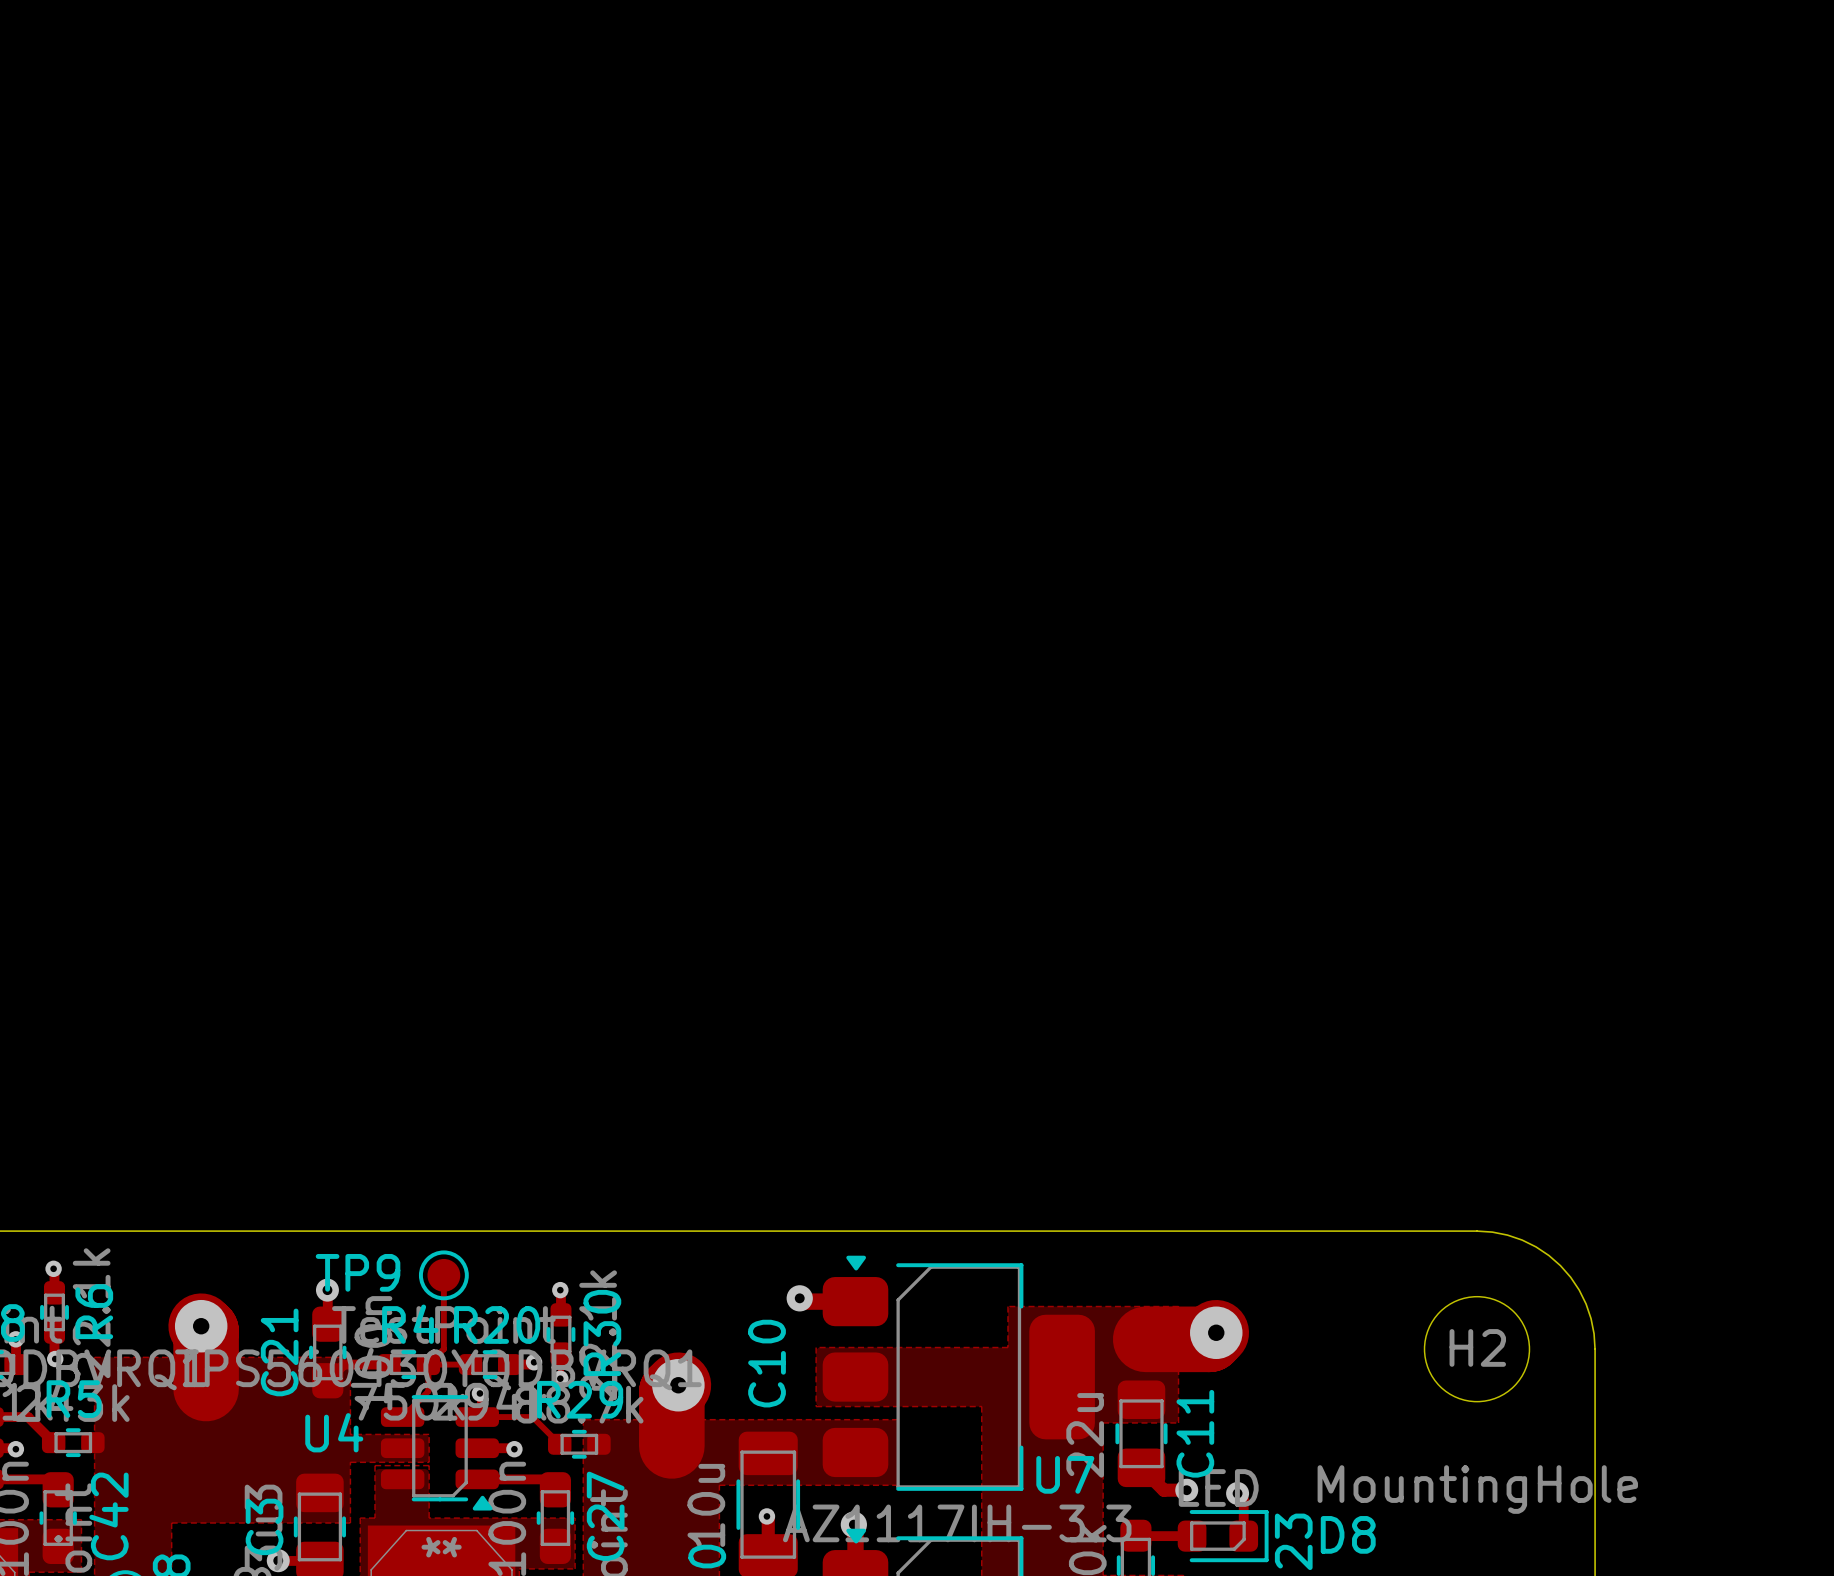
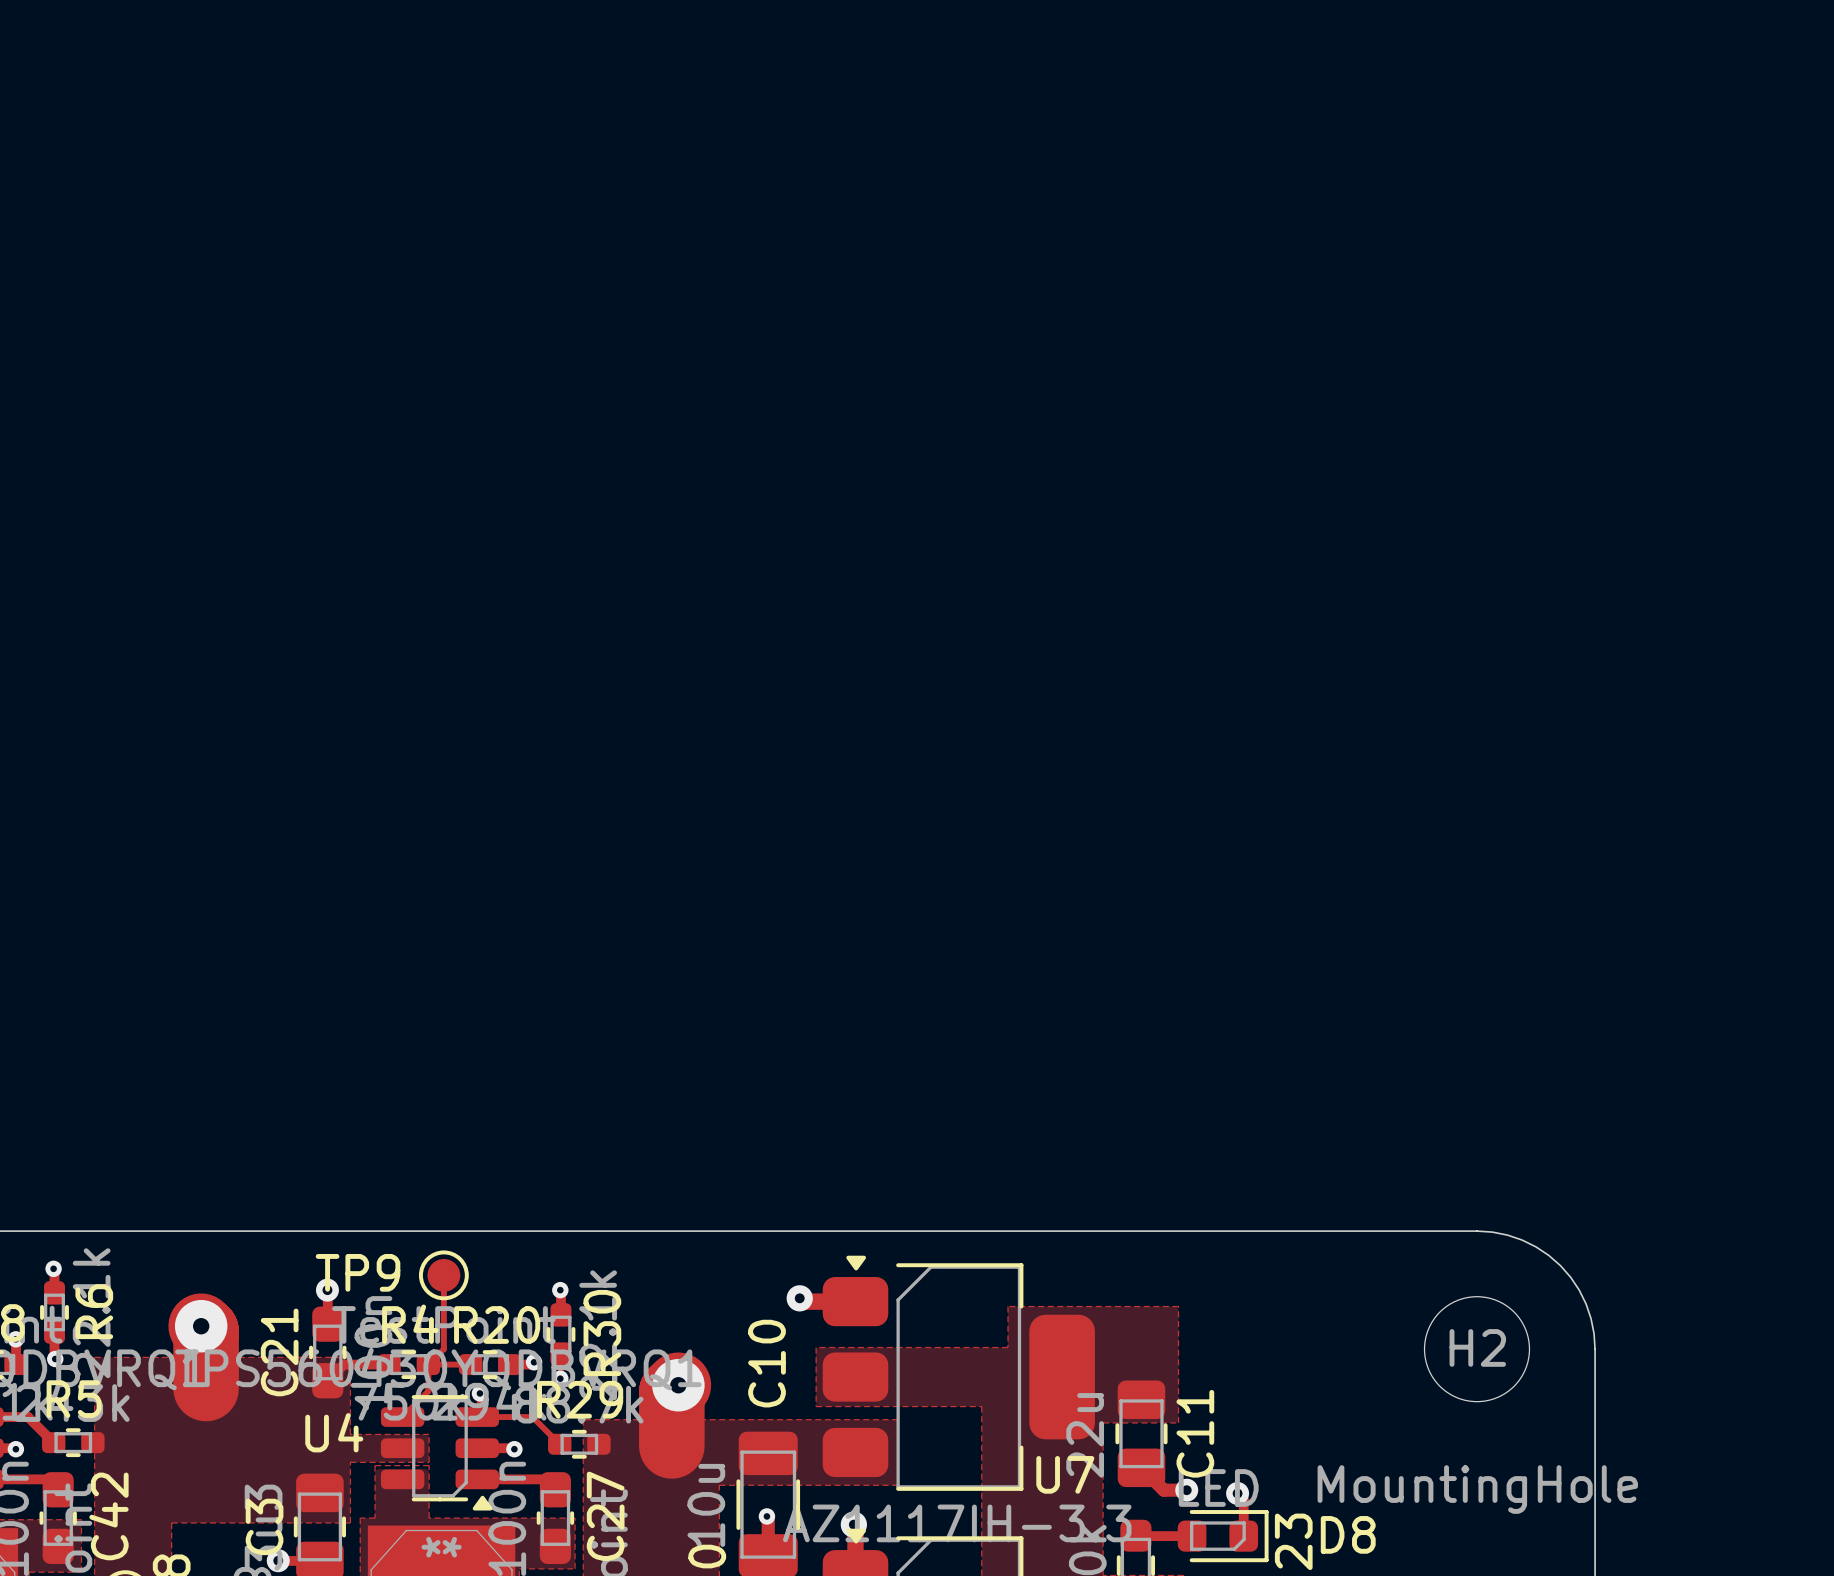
track: (1216, 1332) (1209, 1339) (1145, 1339) -> none
via: (1216, 1332) -> none

